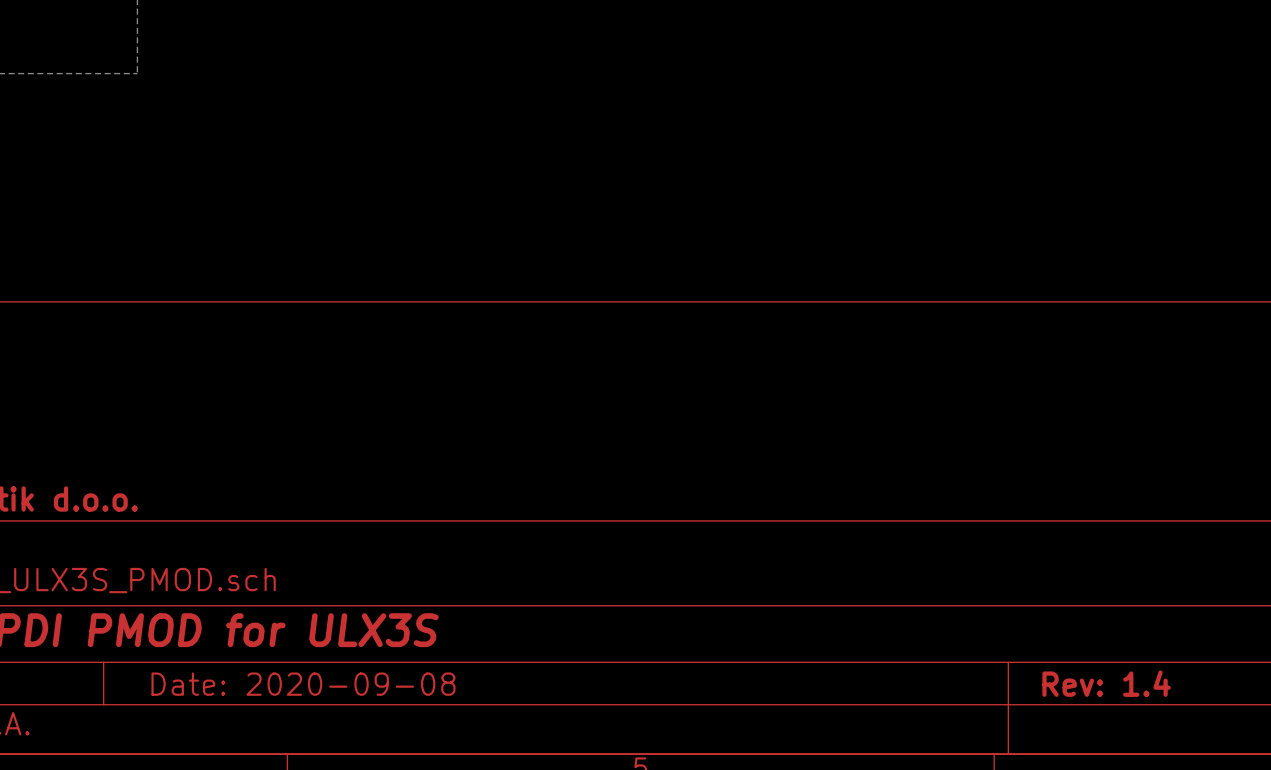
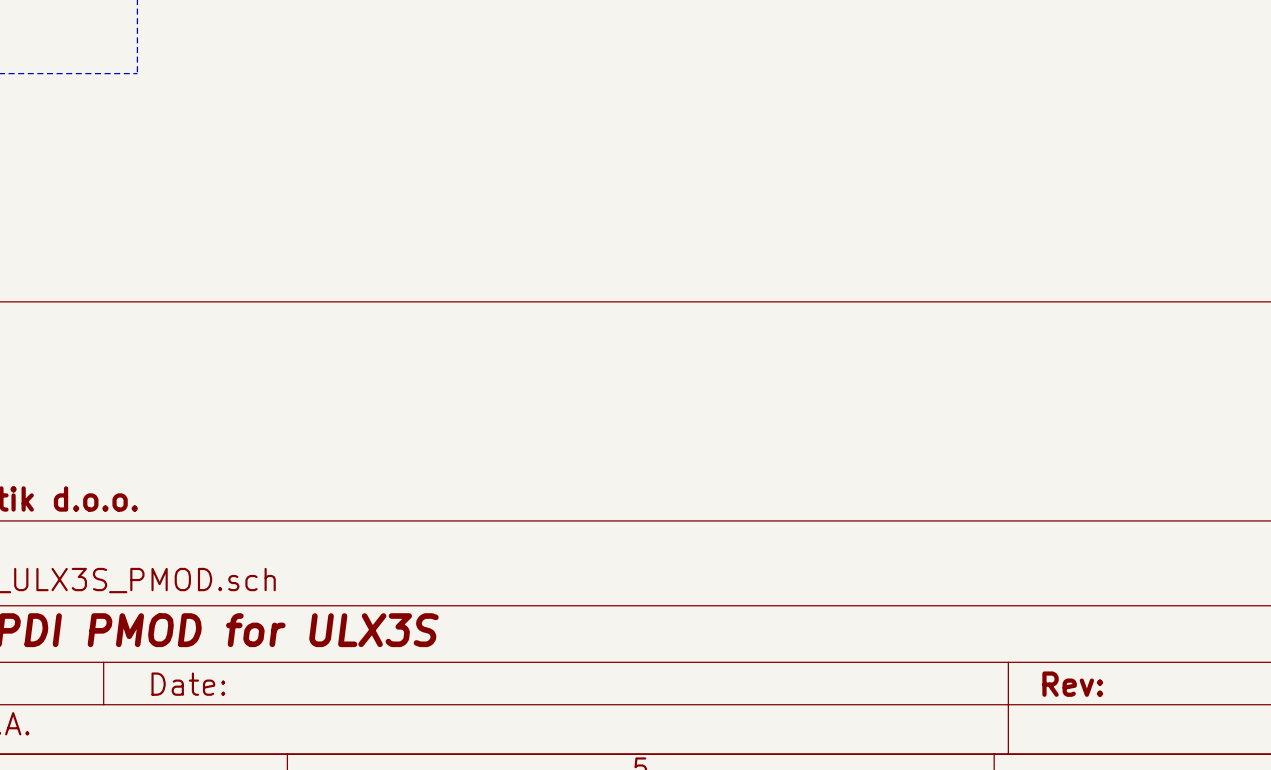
title block: Rev: 1.4 (1106, 683) -> Rev: (1072, 684)
title block: Date: 2020-09-08 (303, 684) -> Date: (188, 684)

